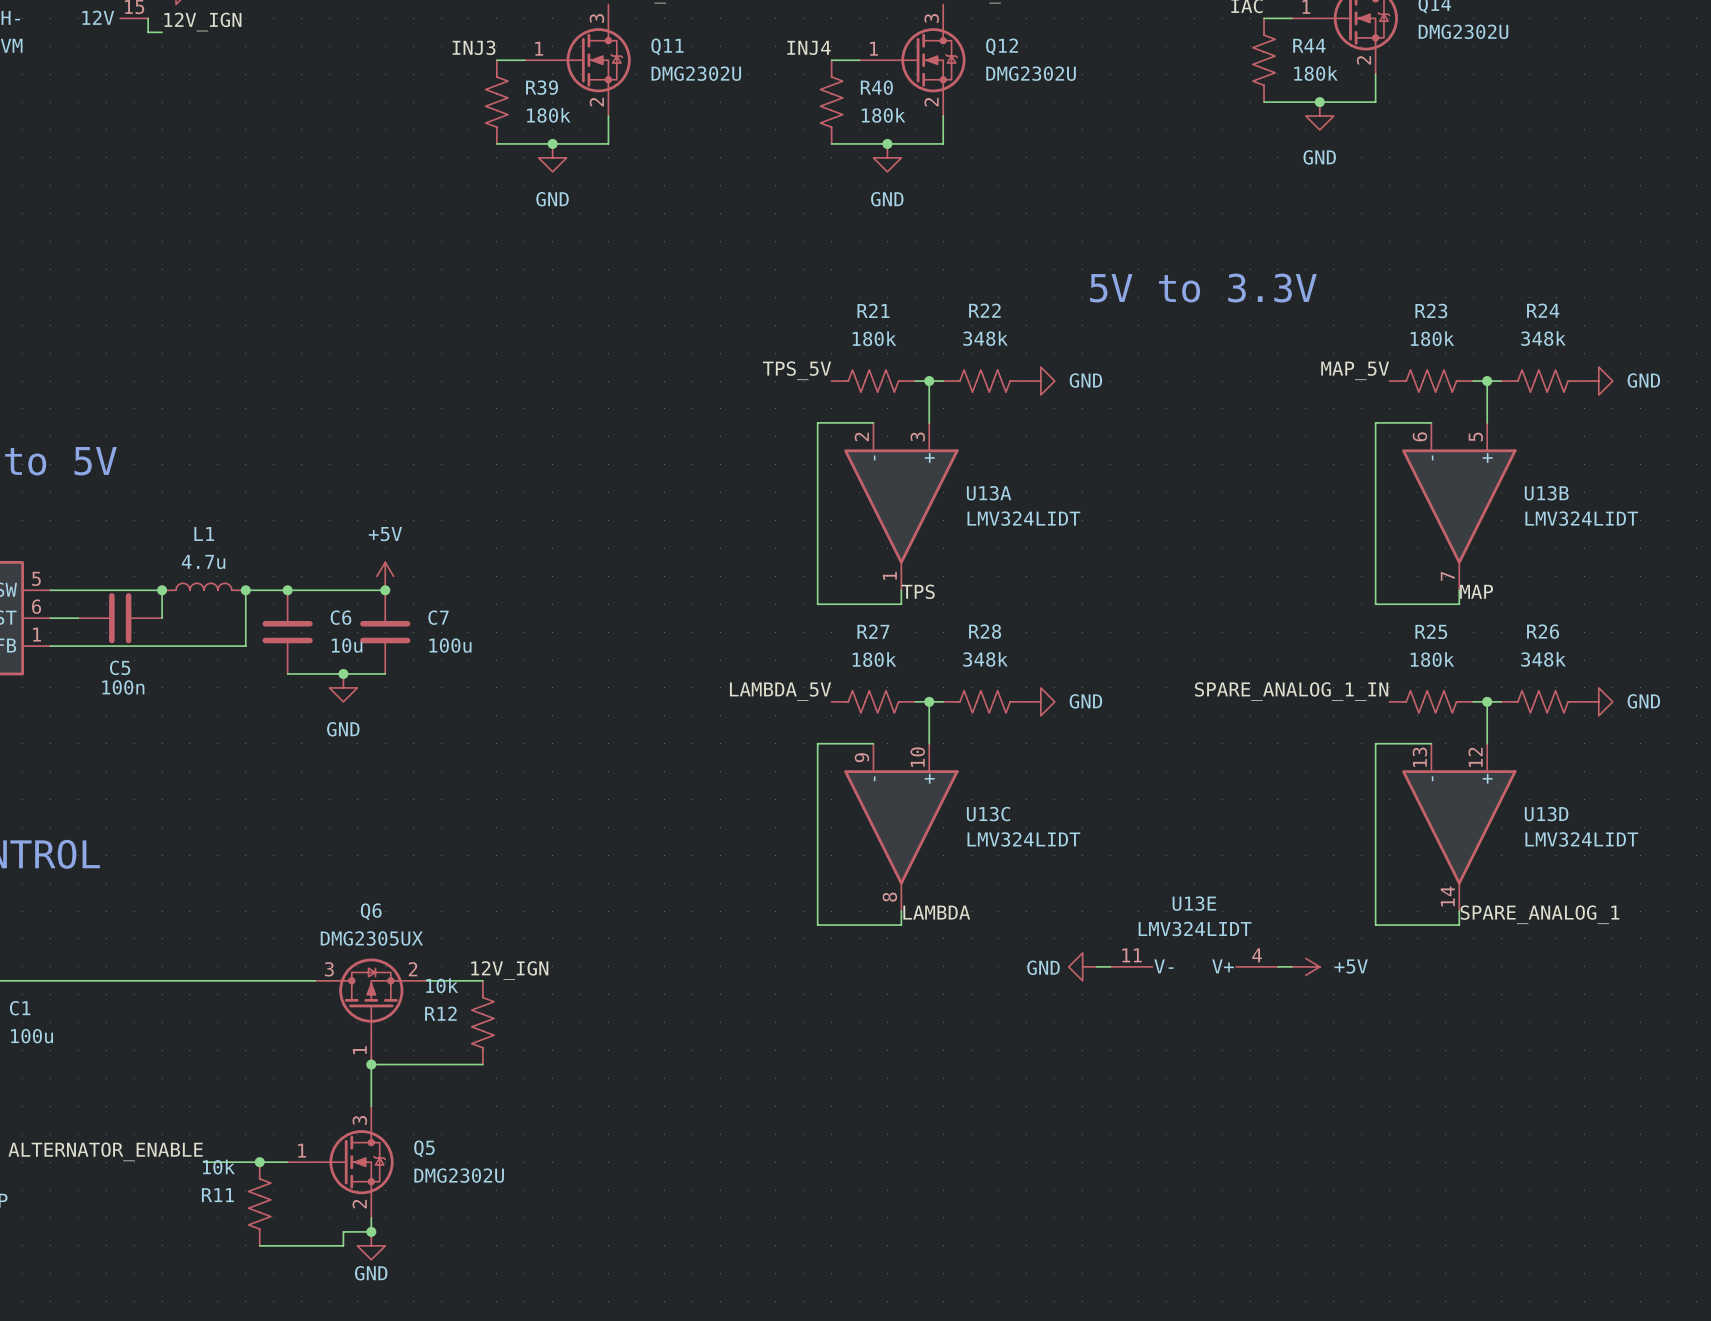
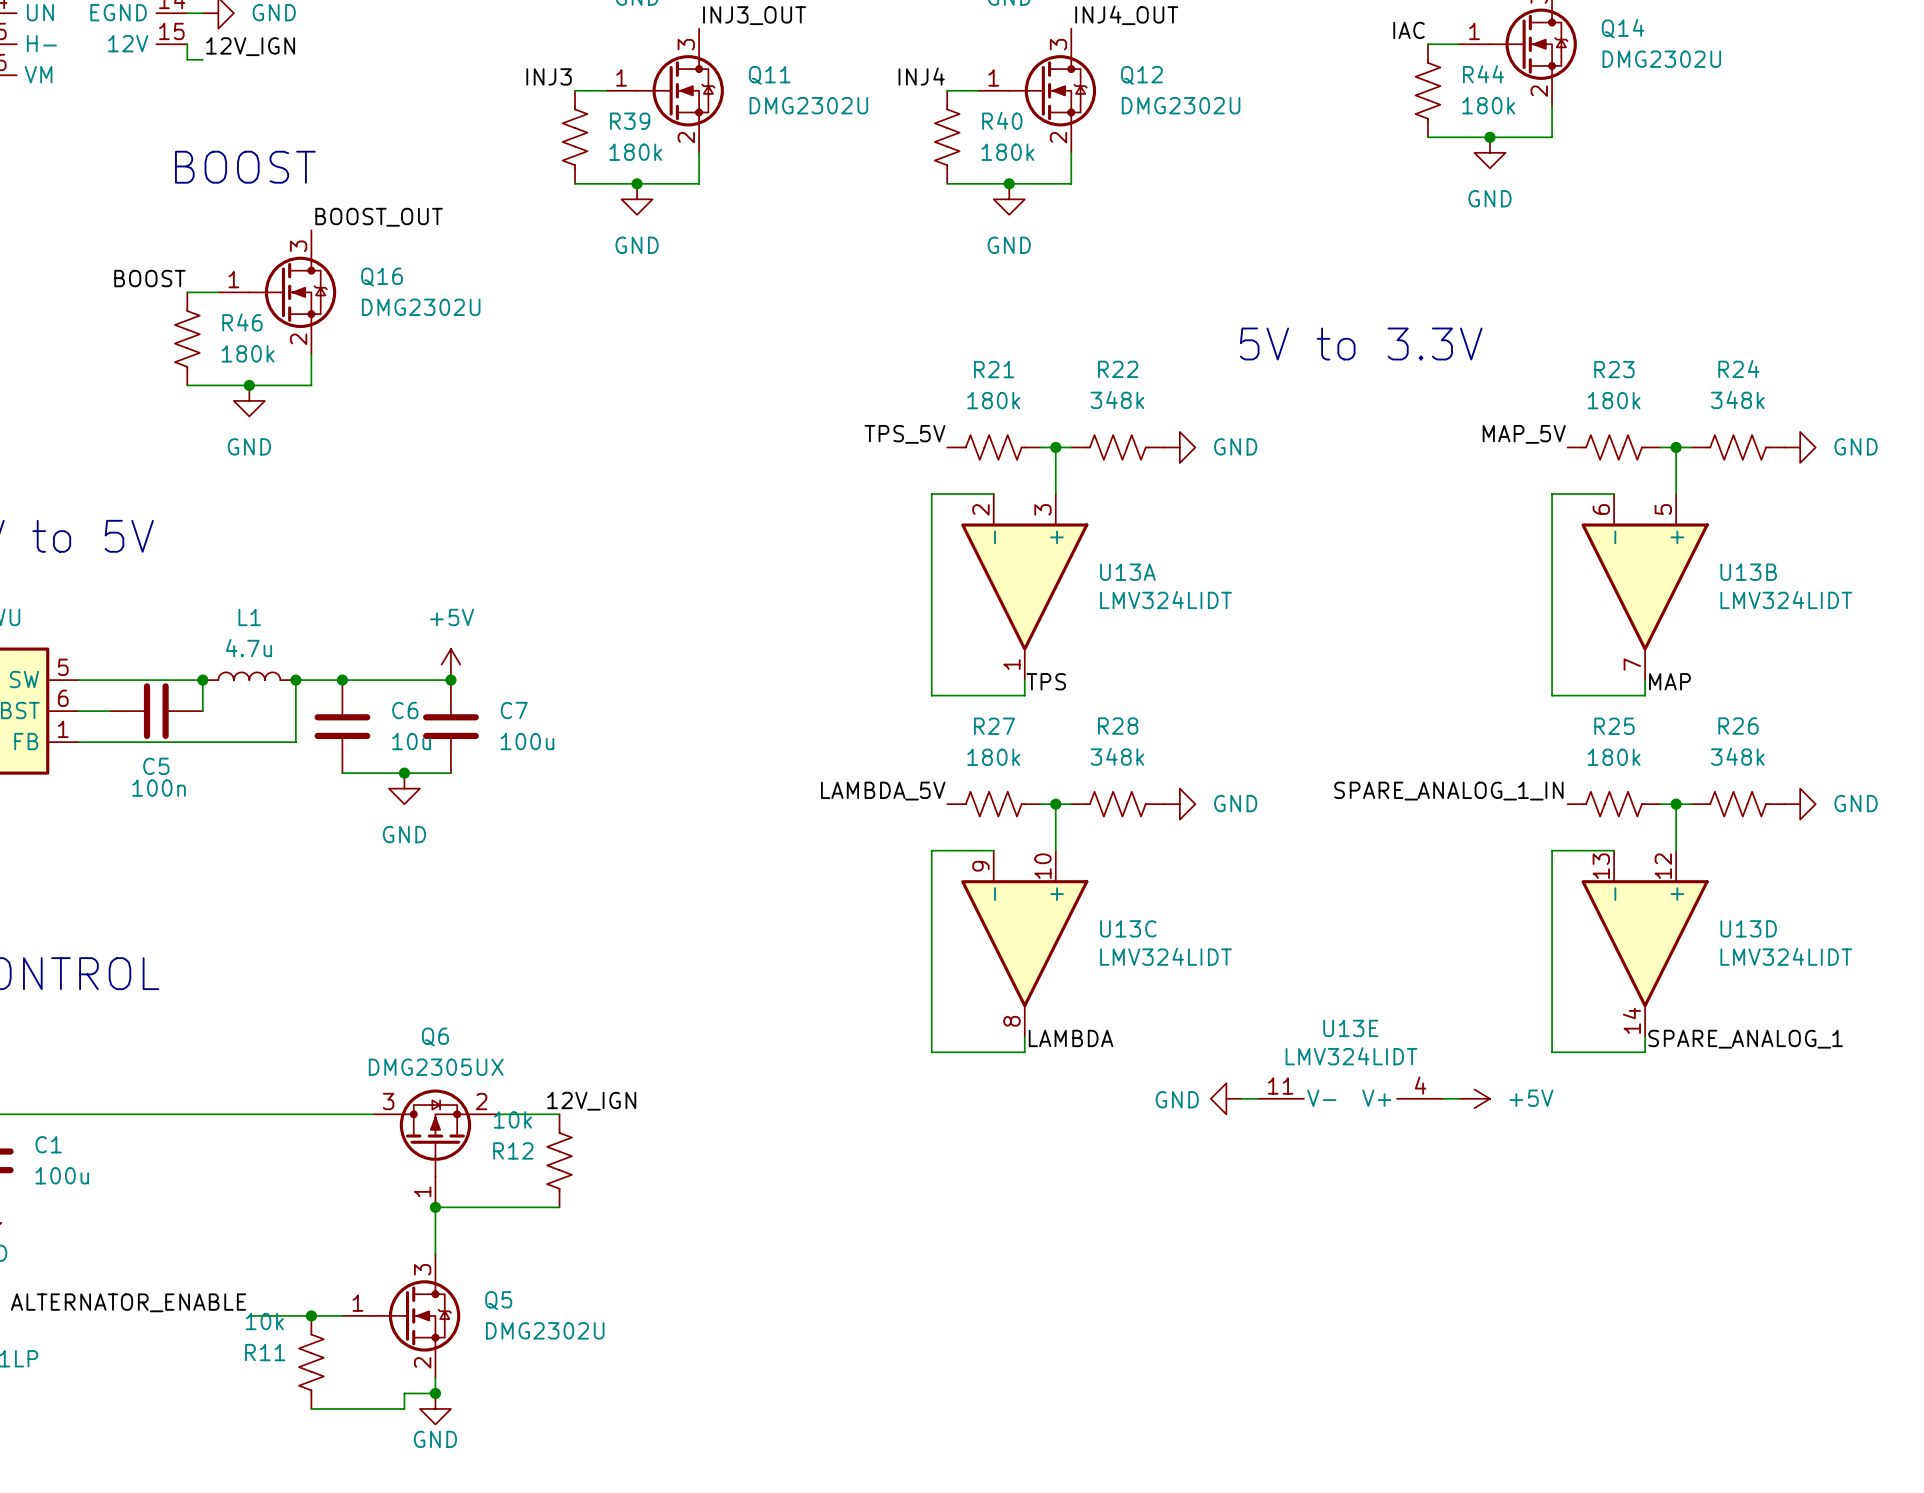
text: none -> BOOST (245, 167)
label: none -> BOOST_OUT (379, 217)
label: none -> BOOST (149, 278)
wire: none -> (187, 292) (218, 292)
Q16: none -> DMG2302U (277, 292)
R46: none -> 180k (187, 338)
wire: none -> (311, 354) (311, 385) (187, 385)
junction: none -> (249, 385)
power symbol: none -> GND (249, 400)

